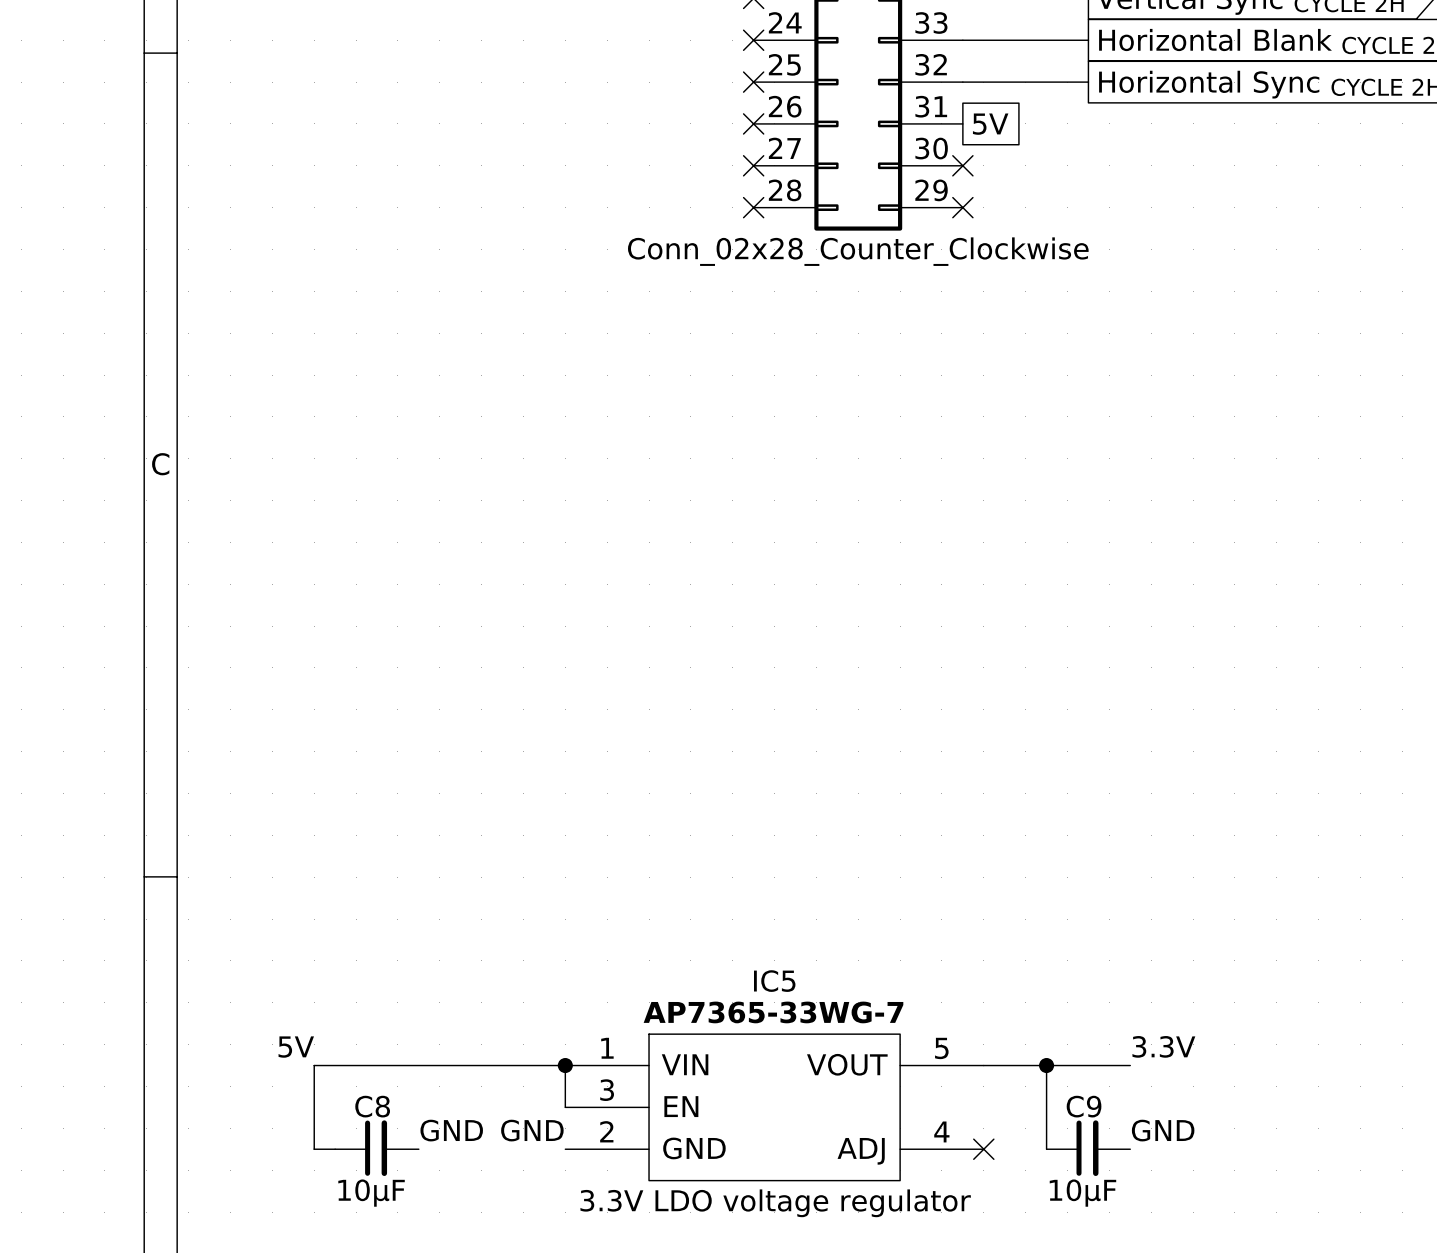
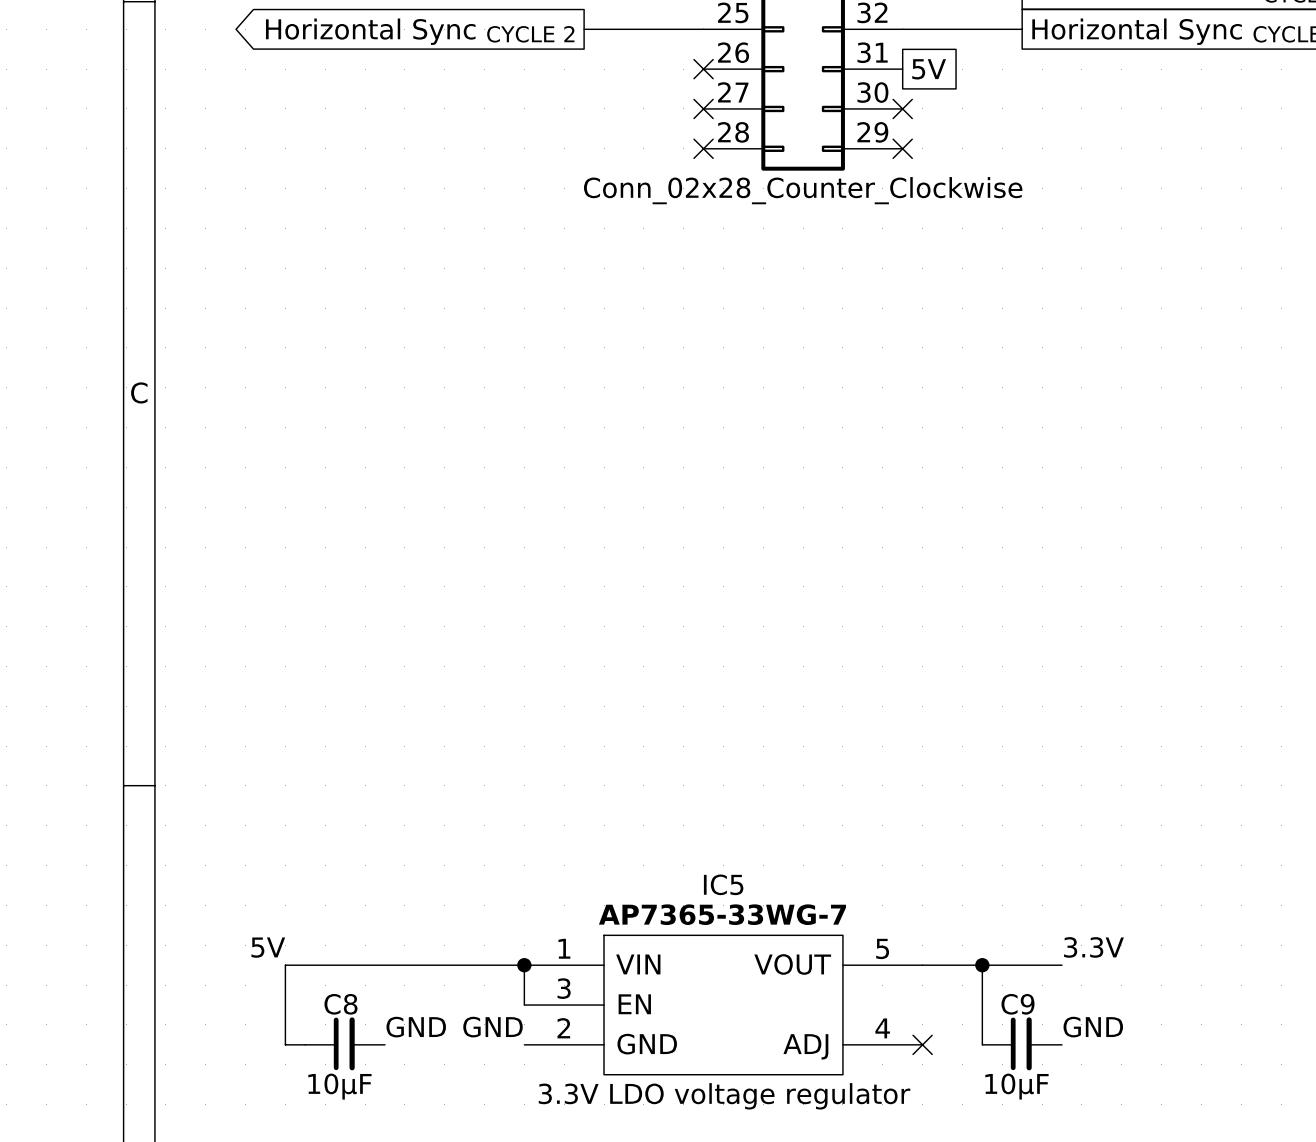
wire: none -> (584, 29) (703, 29)
no-connect mark: (753, 82) -> none
global label: none -> Horizontal Sync CYCLE 2 (420, 31)

